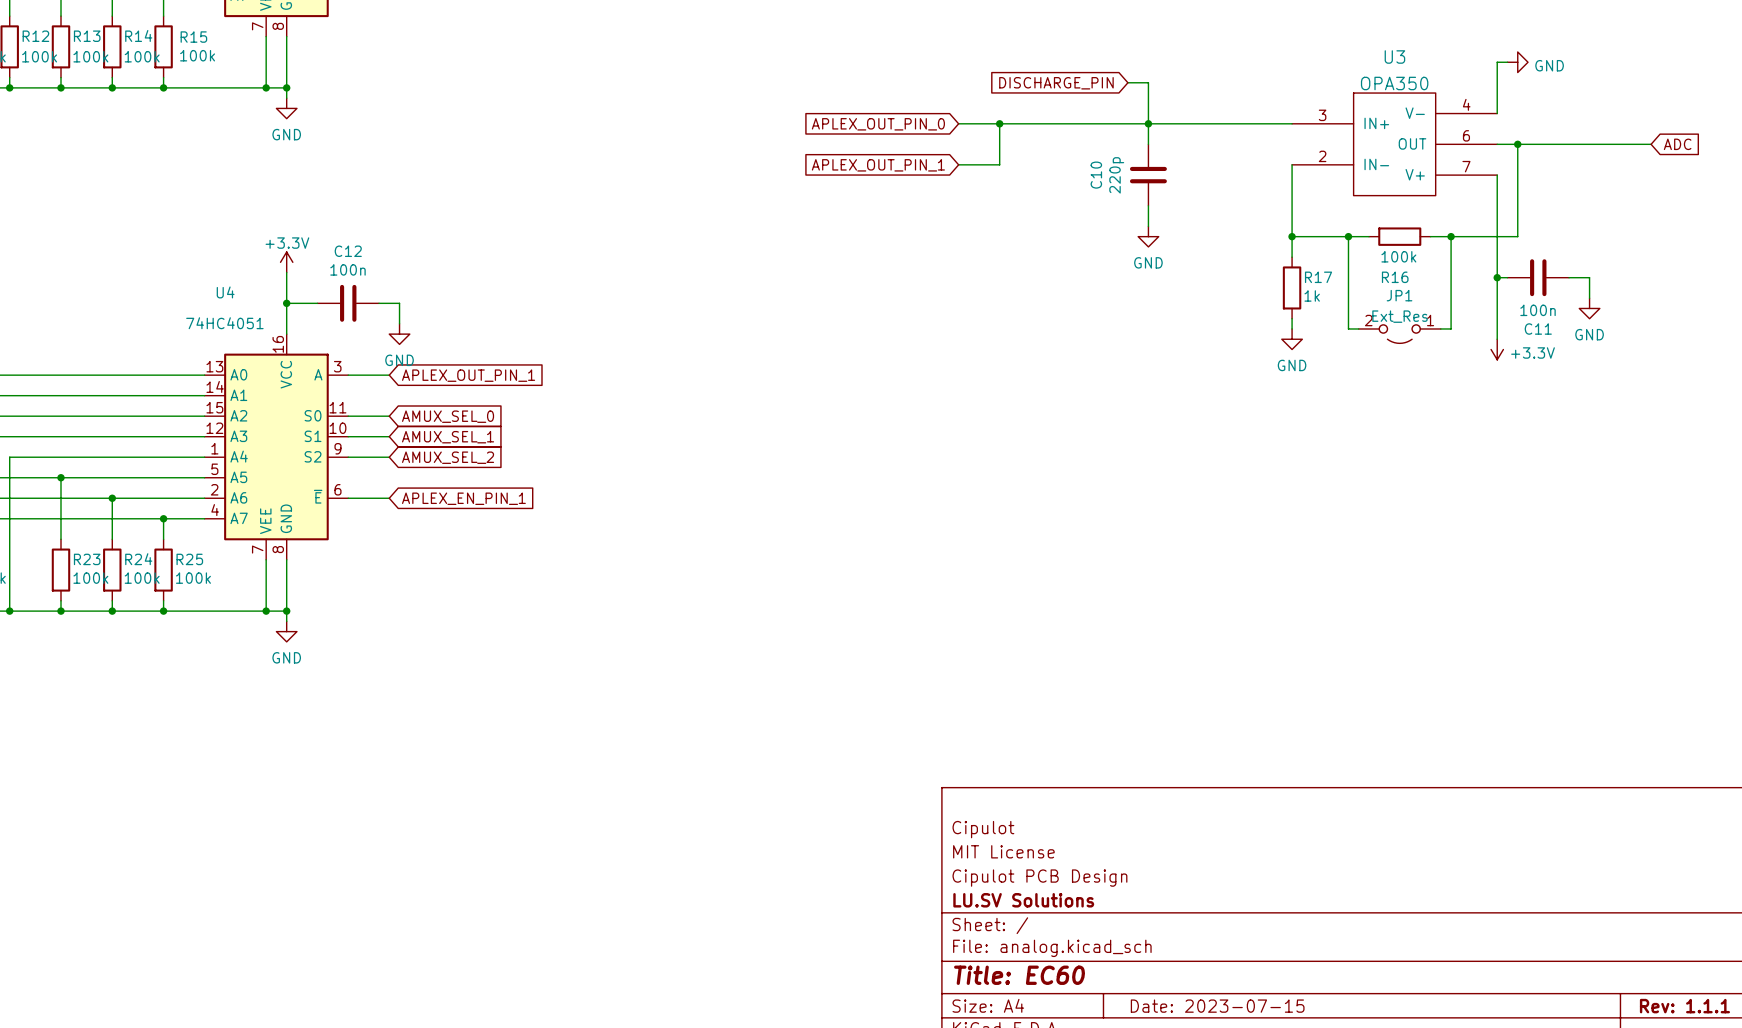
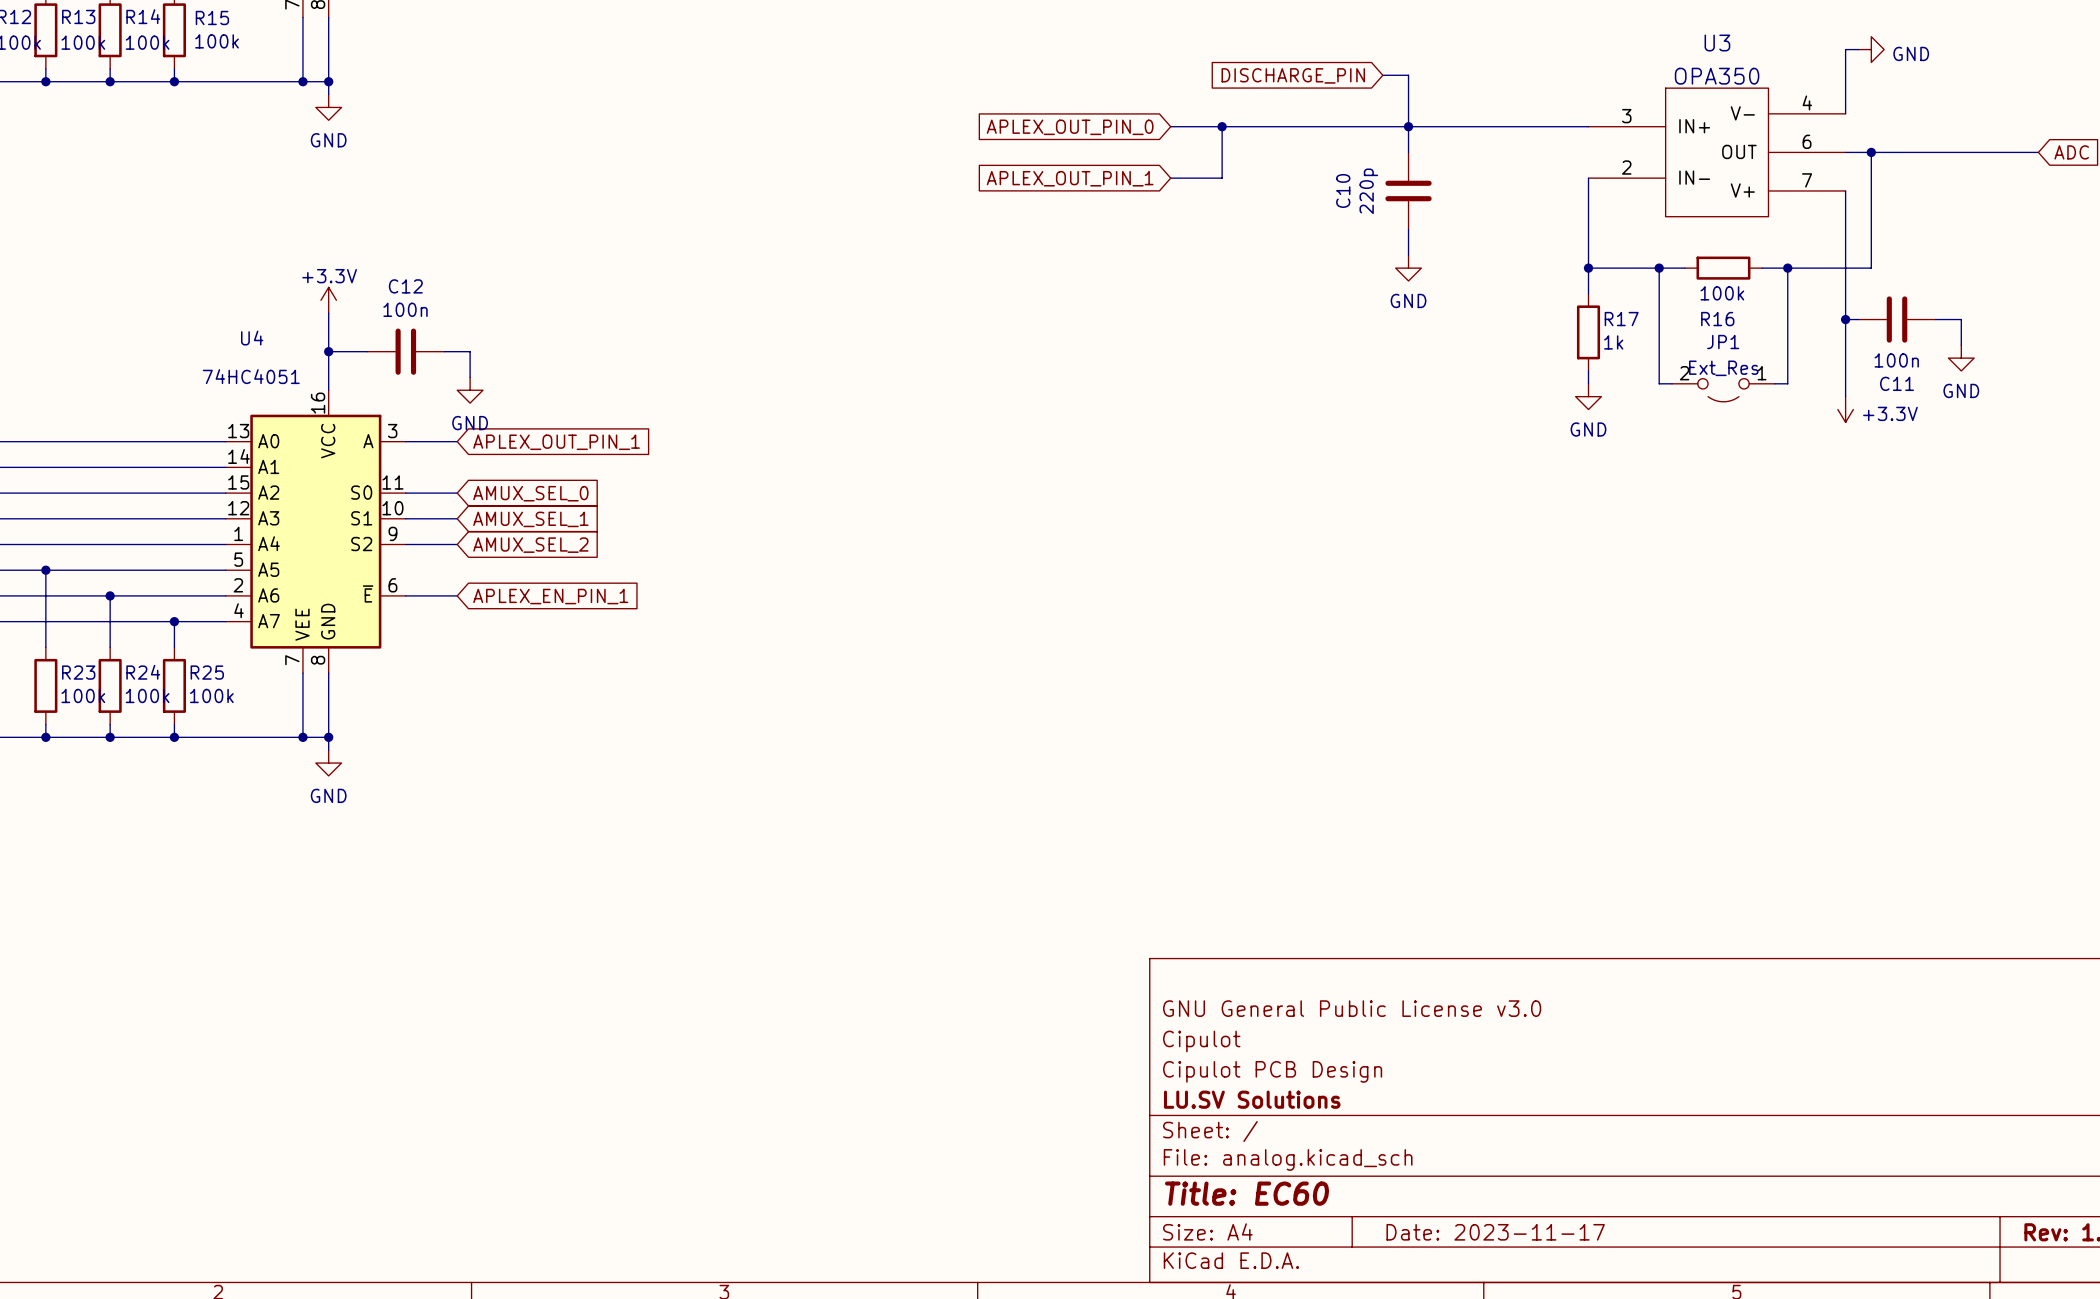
title block: Cipulot (983, 829) -> GNU General Public License v3.0 (1352, 1008)
title block: MIT License (1003, 851) -> Cipulot (1201, 1041)
title block: Date: 2023-07-15 (1217, 1006) -> Date: 2023-11-17 (1495, 1232)

